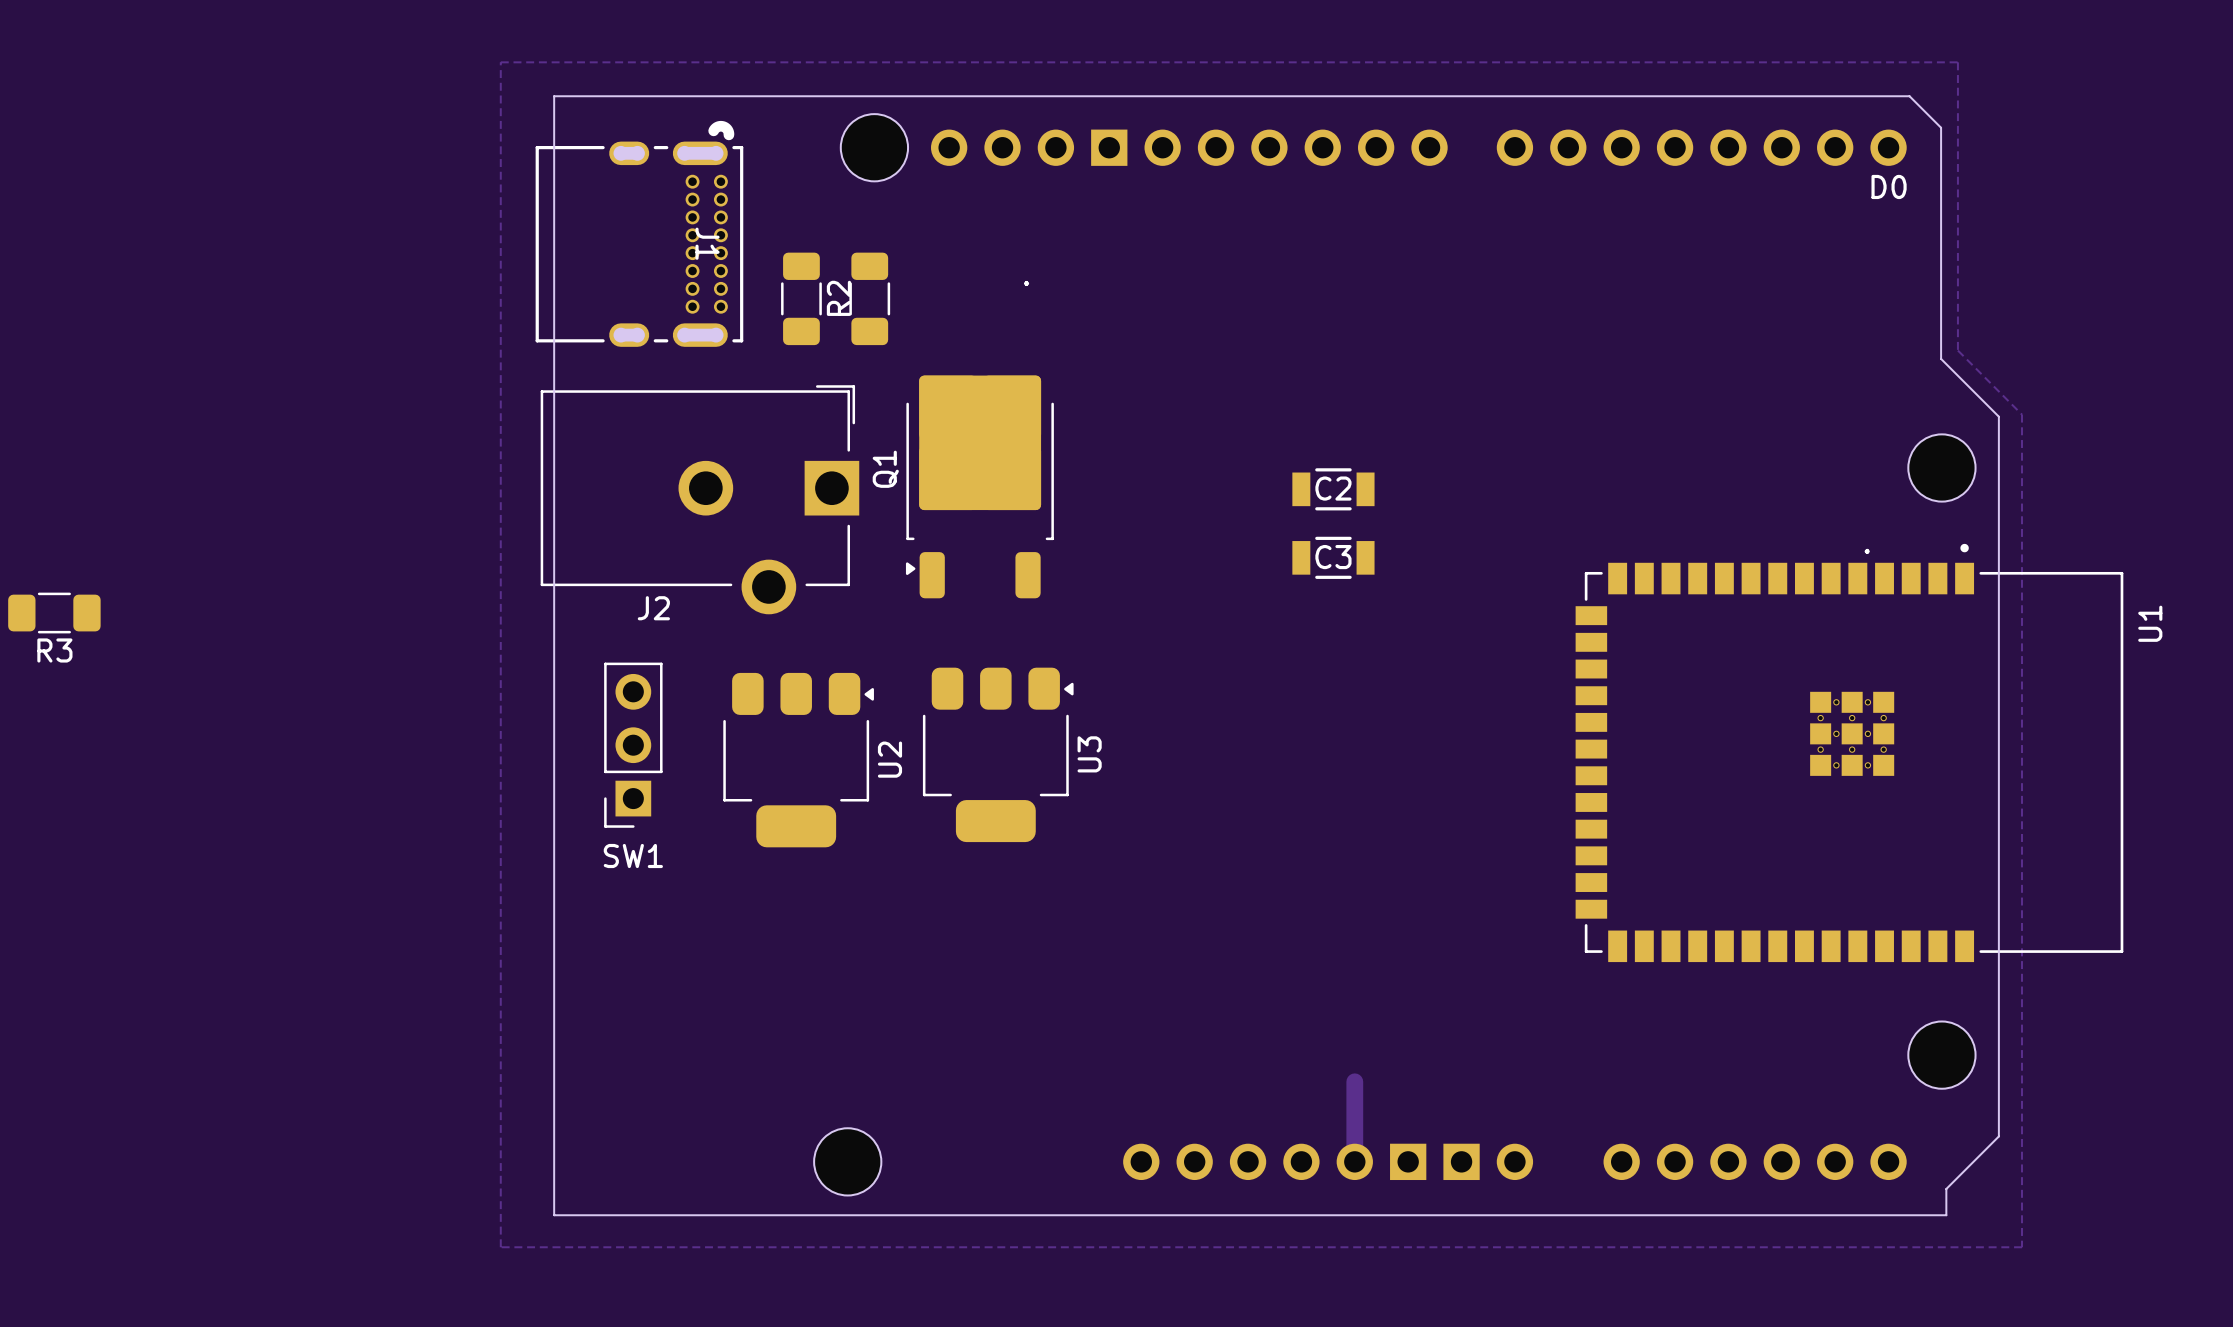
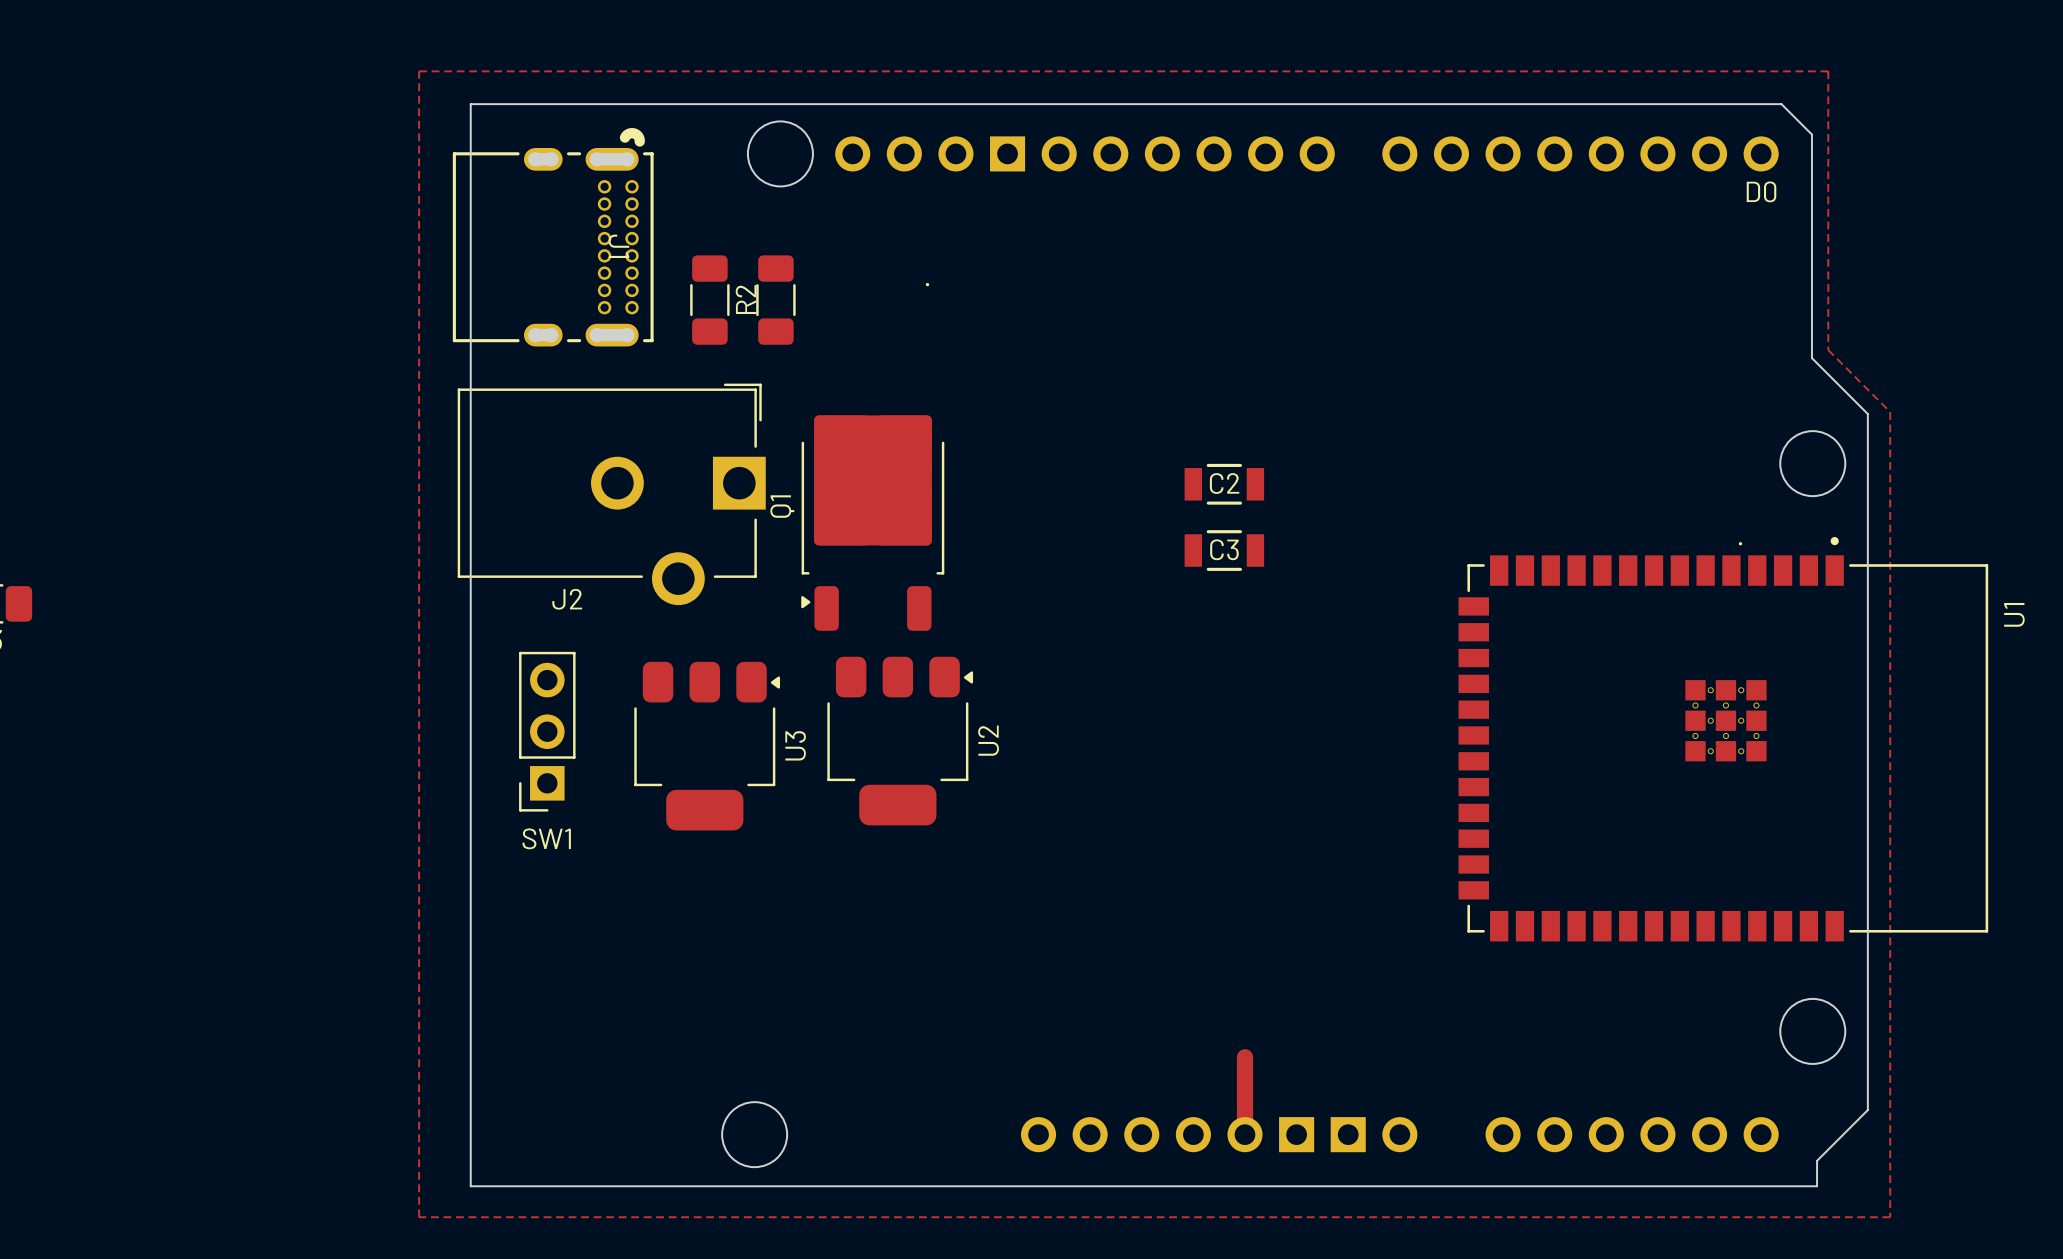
Q1 position: (979, 486) -> (872, 523)
U3 name: U3 (1089, 754) -> U2 (988, 740)
U2 name: U2 (889, 759) -> U3 (795, 745)

